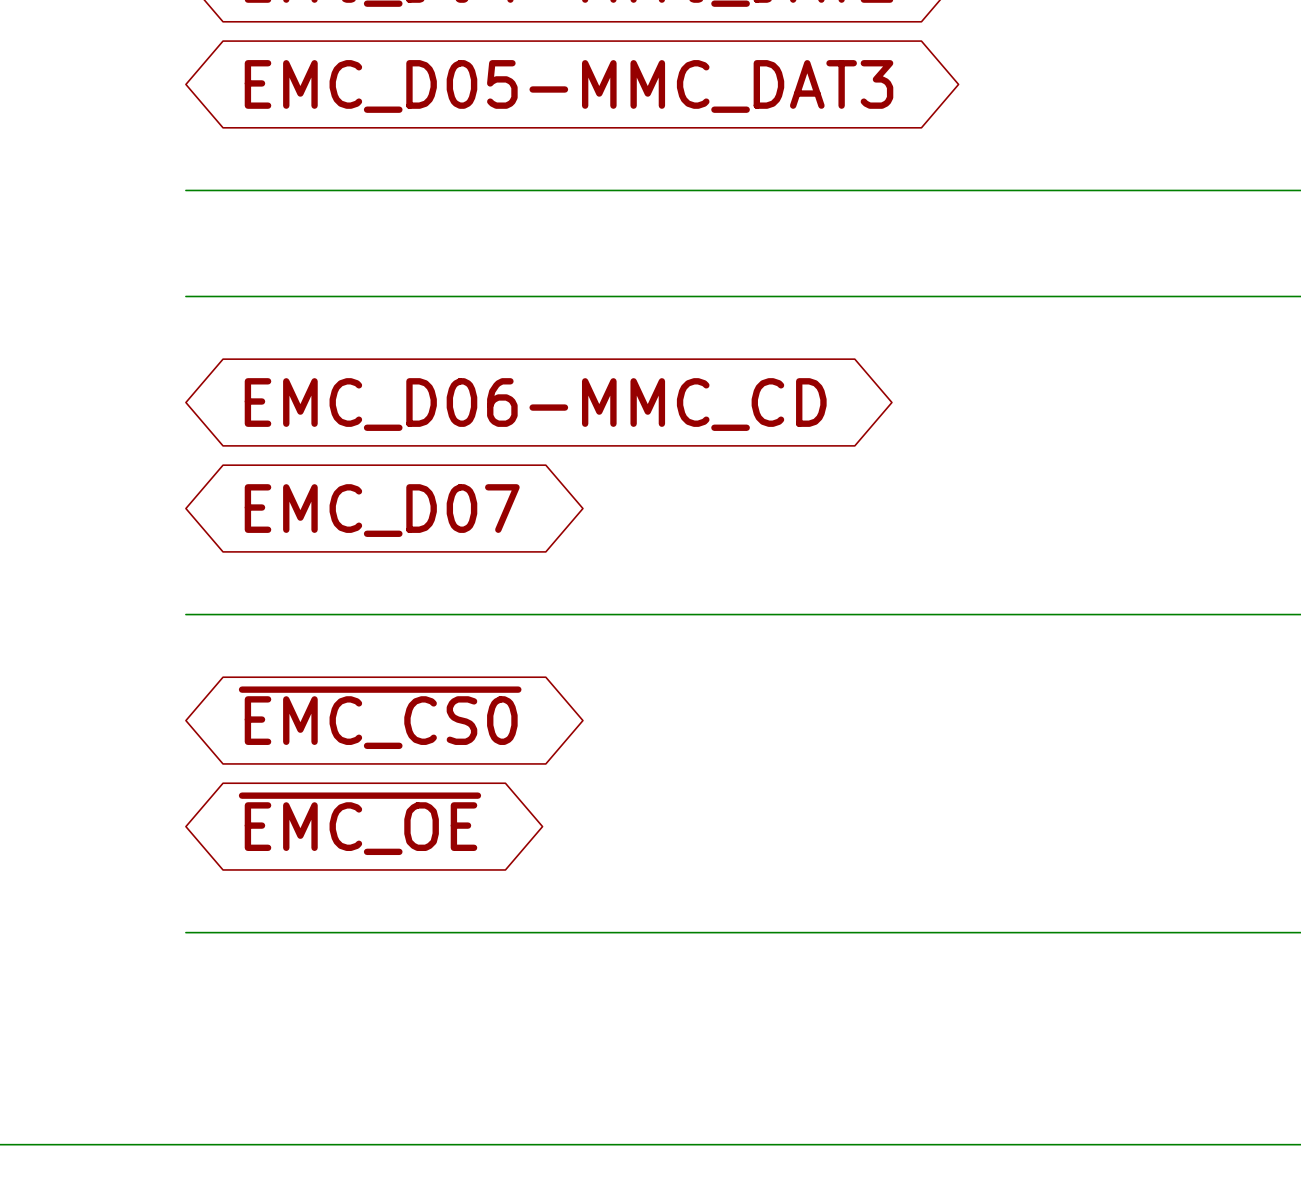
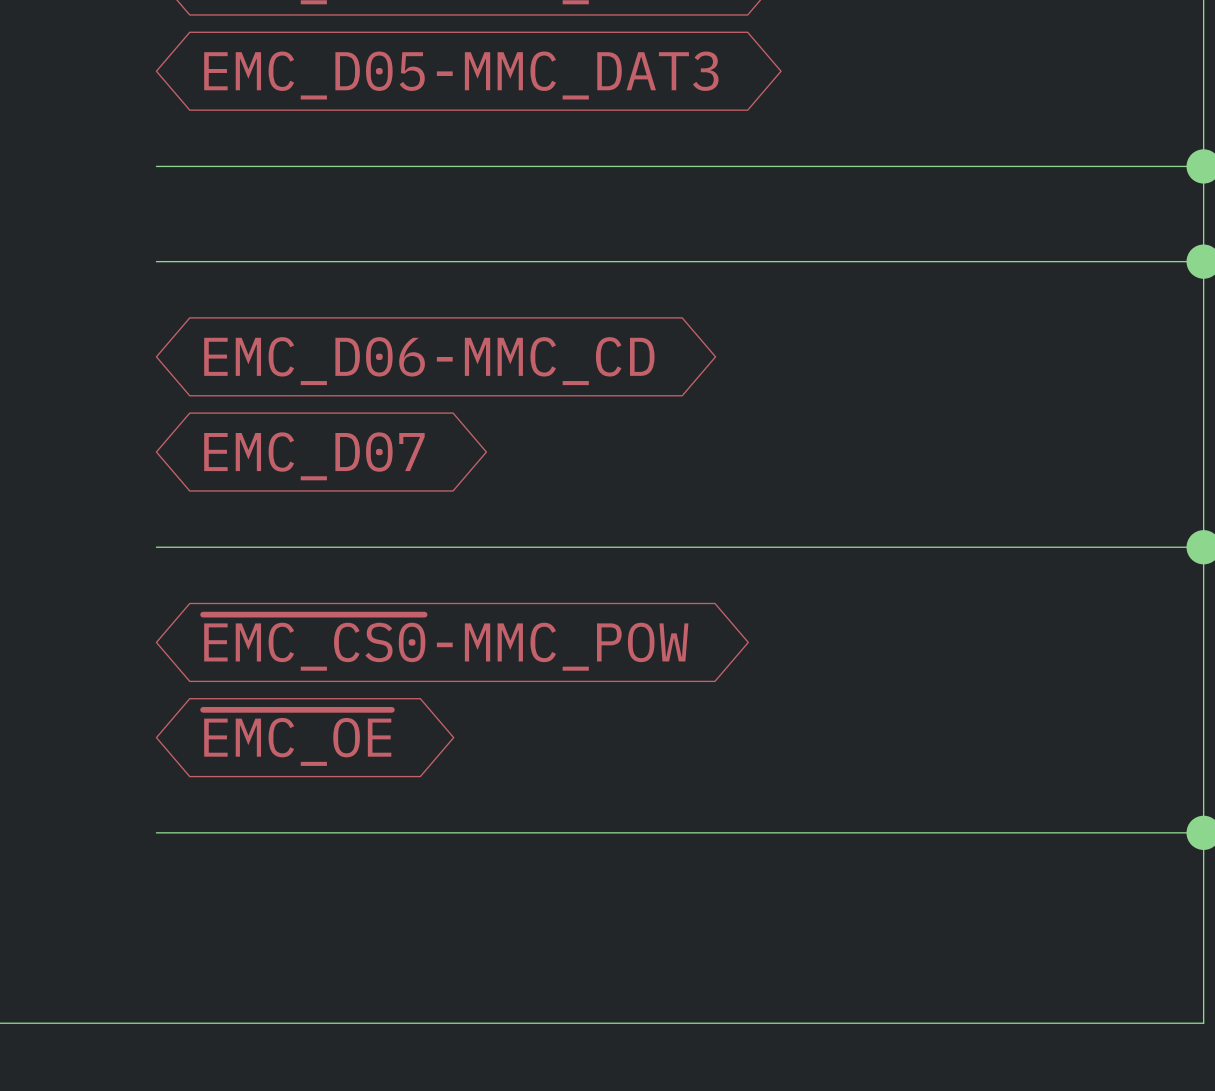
global label: ~{EMC_CS0} (380, 717) -> ~{EMC_CS0}-MMC_POW (445, 642)

